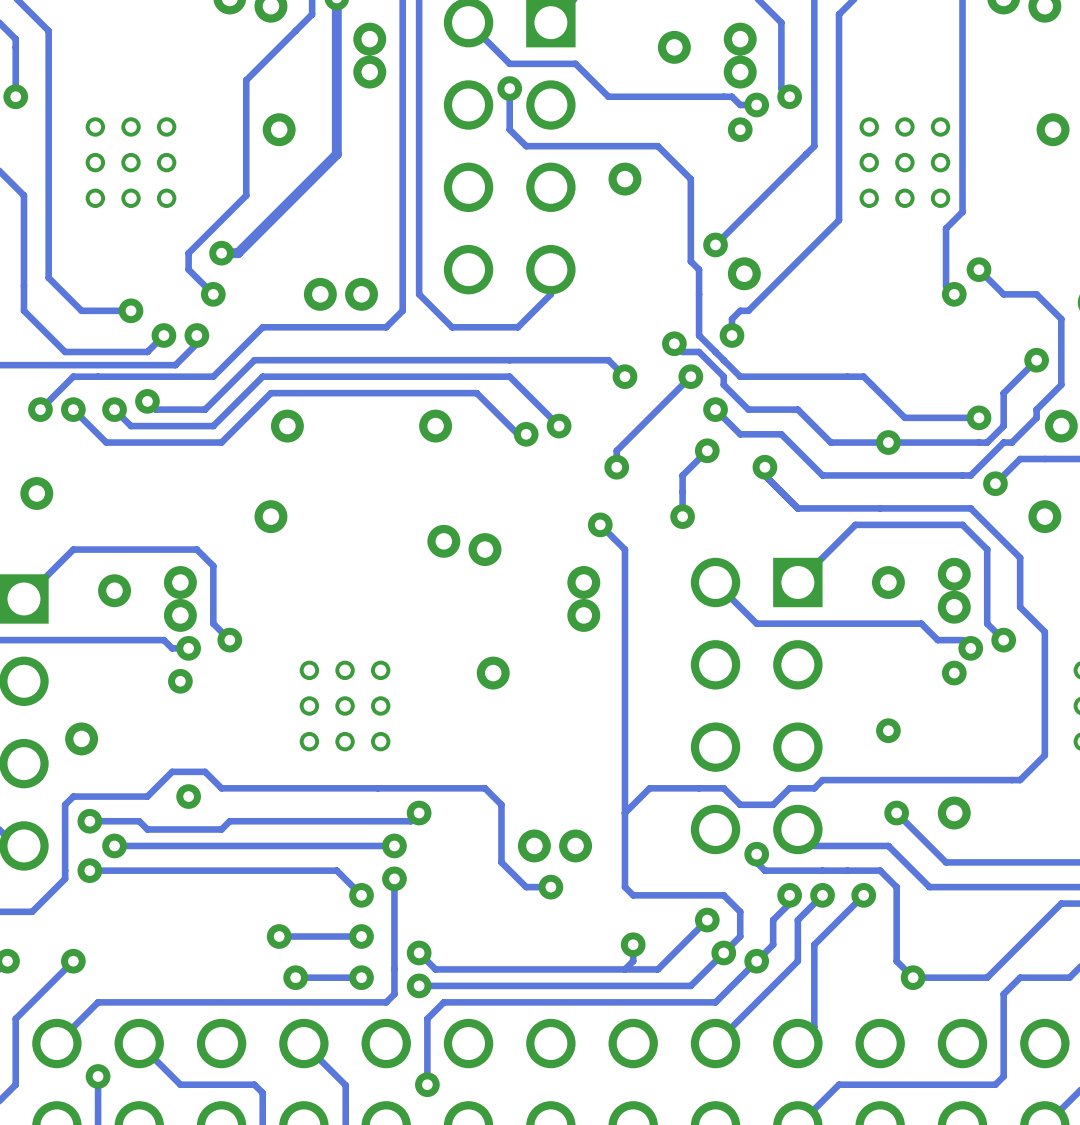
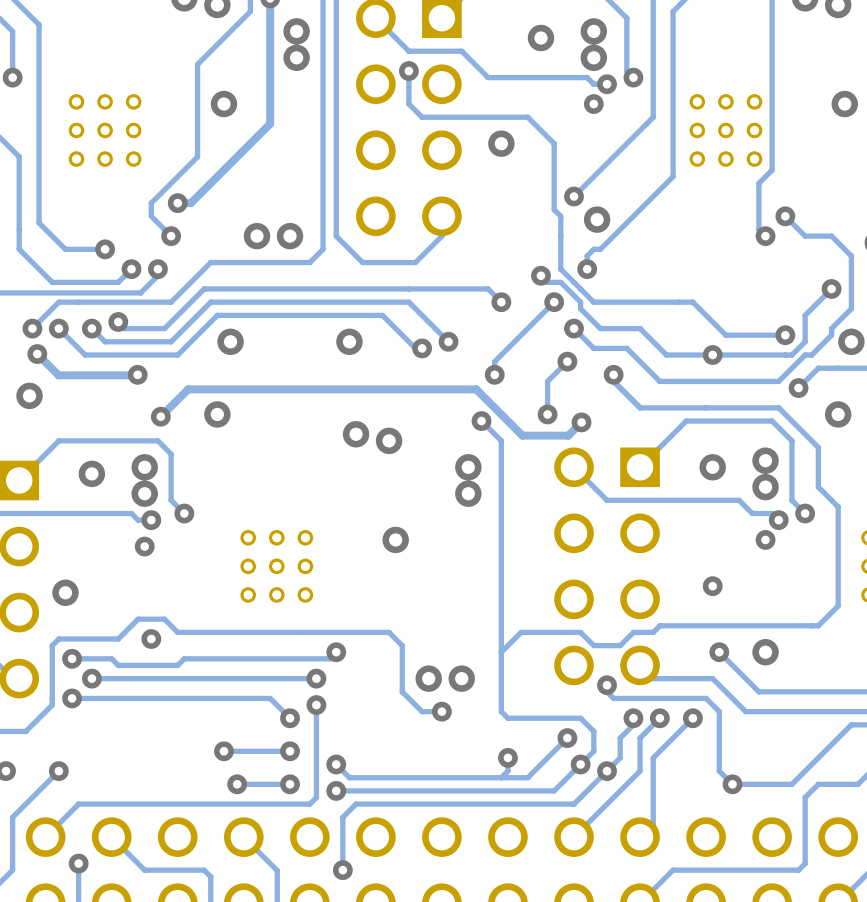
track: none -> (37, 354) (58, 375) (137, 374)
via: none -> (37, 354)
via: none -> (137, 374)
track: none -> (160, 416) (188, 389) (476, 389) (522, 435) (568, 435) (581, 422)
via: none -> (160, 416)
via: none -> (581, 422)

